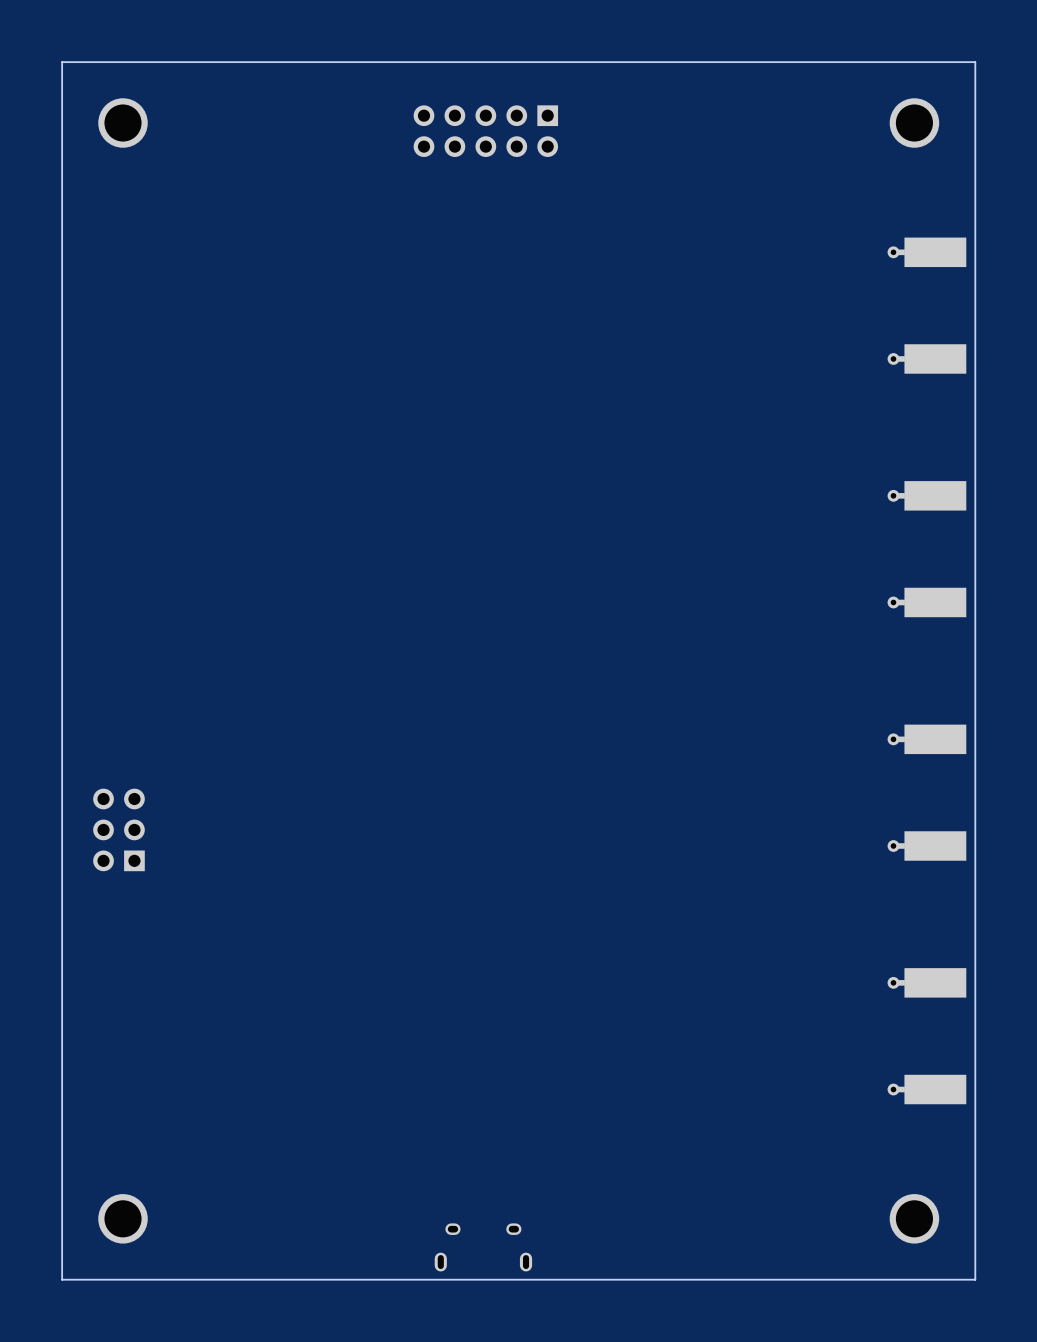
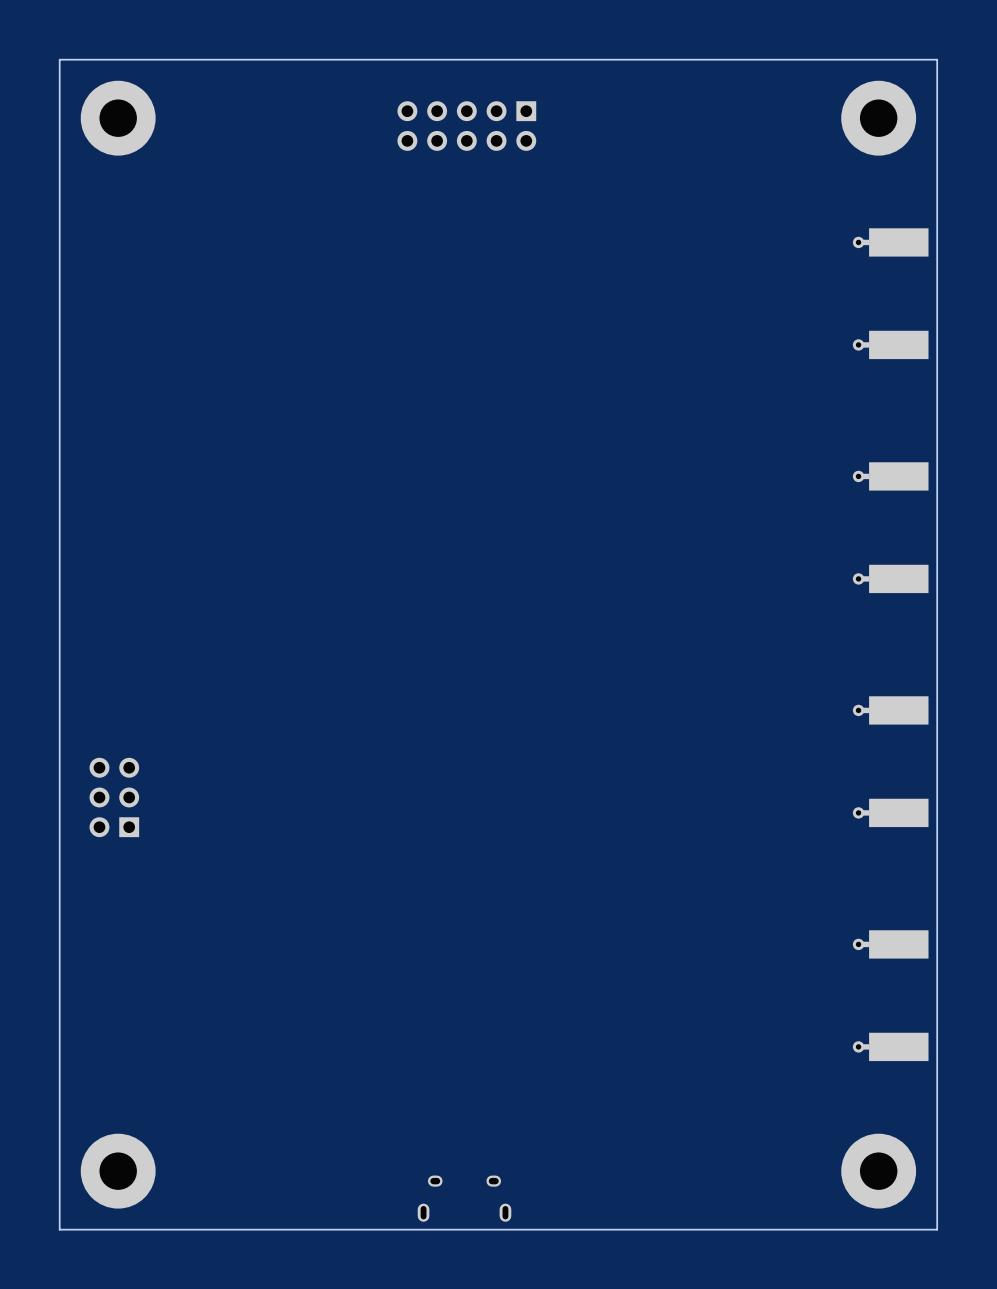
part footprint: [98, 98, 148, 148] -> [80, 80, 156, 156]
part footprint: [889, 98, 940, 148] -> [841, 80, 917, 156]
part footprint: [98, 1194, 148, 1244] -> [80, 1133, 156, 1209]
part footprint: [889, 1194, 940, 1244] -> [841, 1133, 917, 1209]

